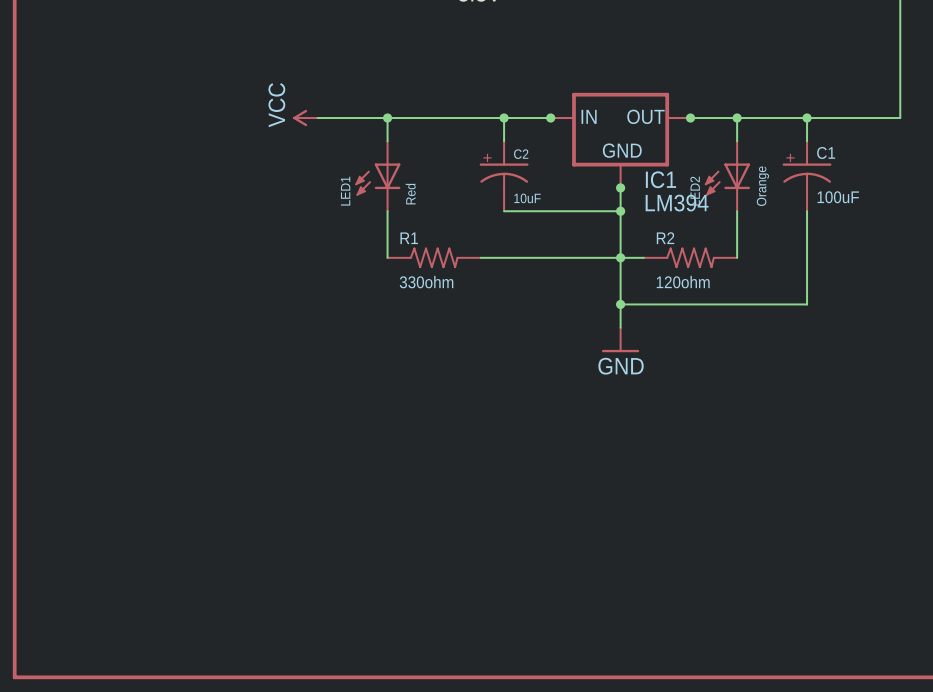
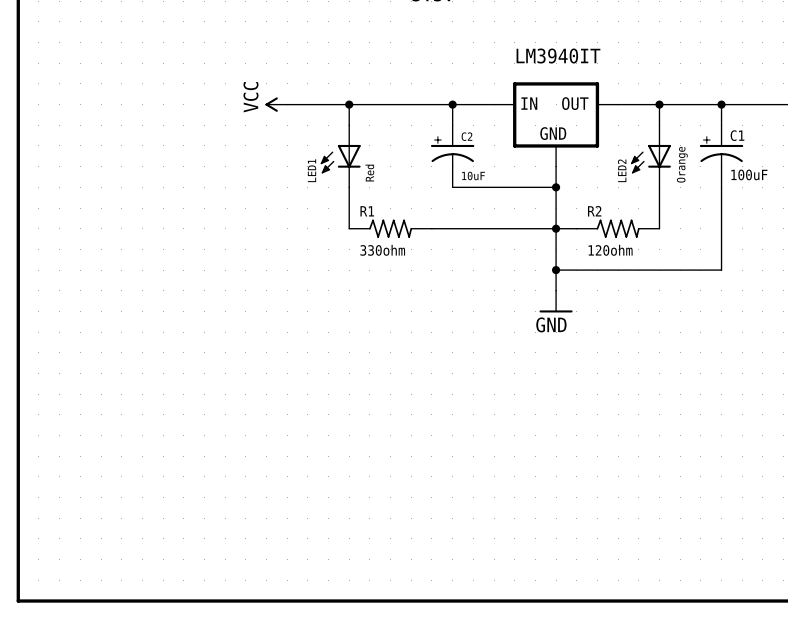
junction: (550, 118) -> none
junction: (690, 118) -> none
IC1 name: IC1 (660, 179) -> LM3940IT (558, 56)
junction: (620, 187) -> none
IC1 value: LM394 (677, 203) -> none

